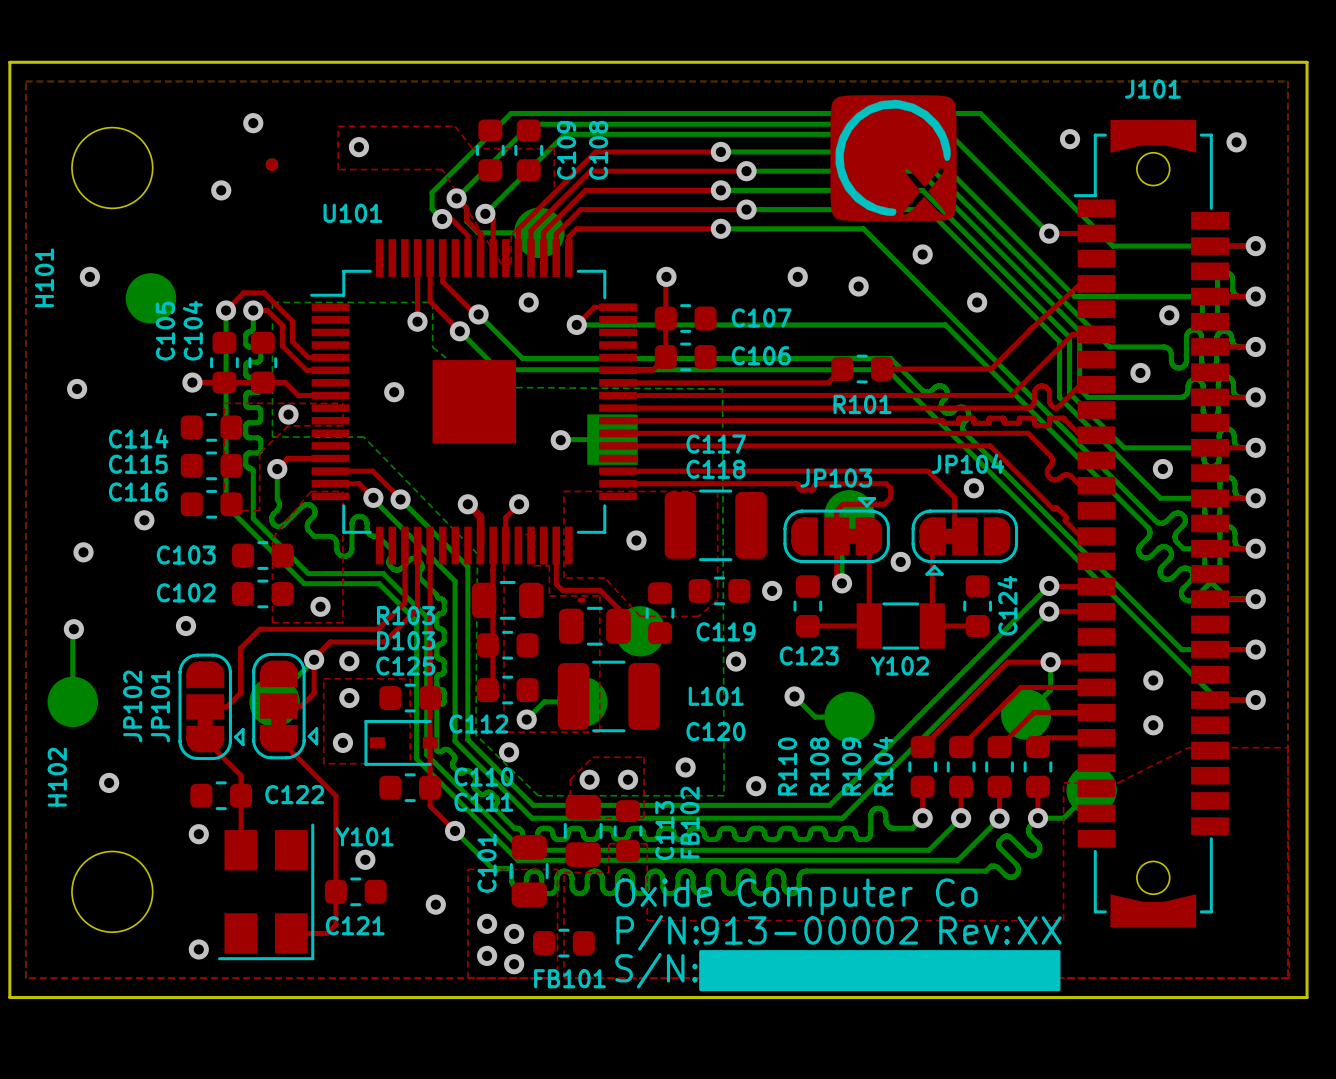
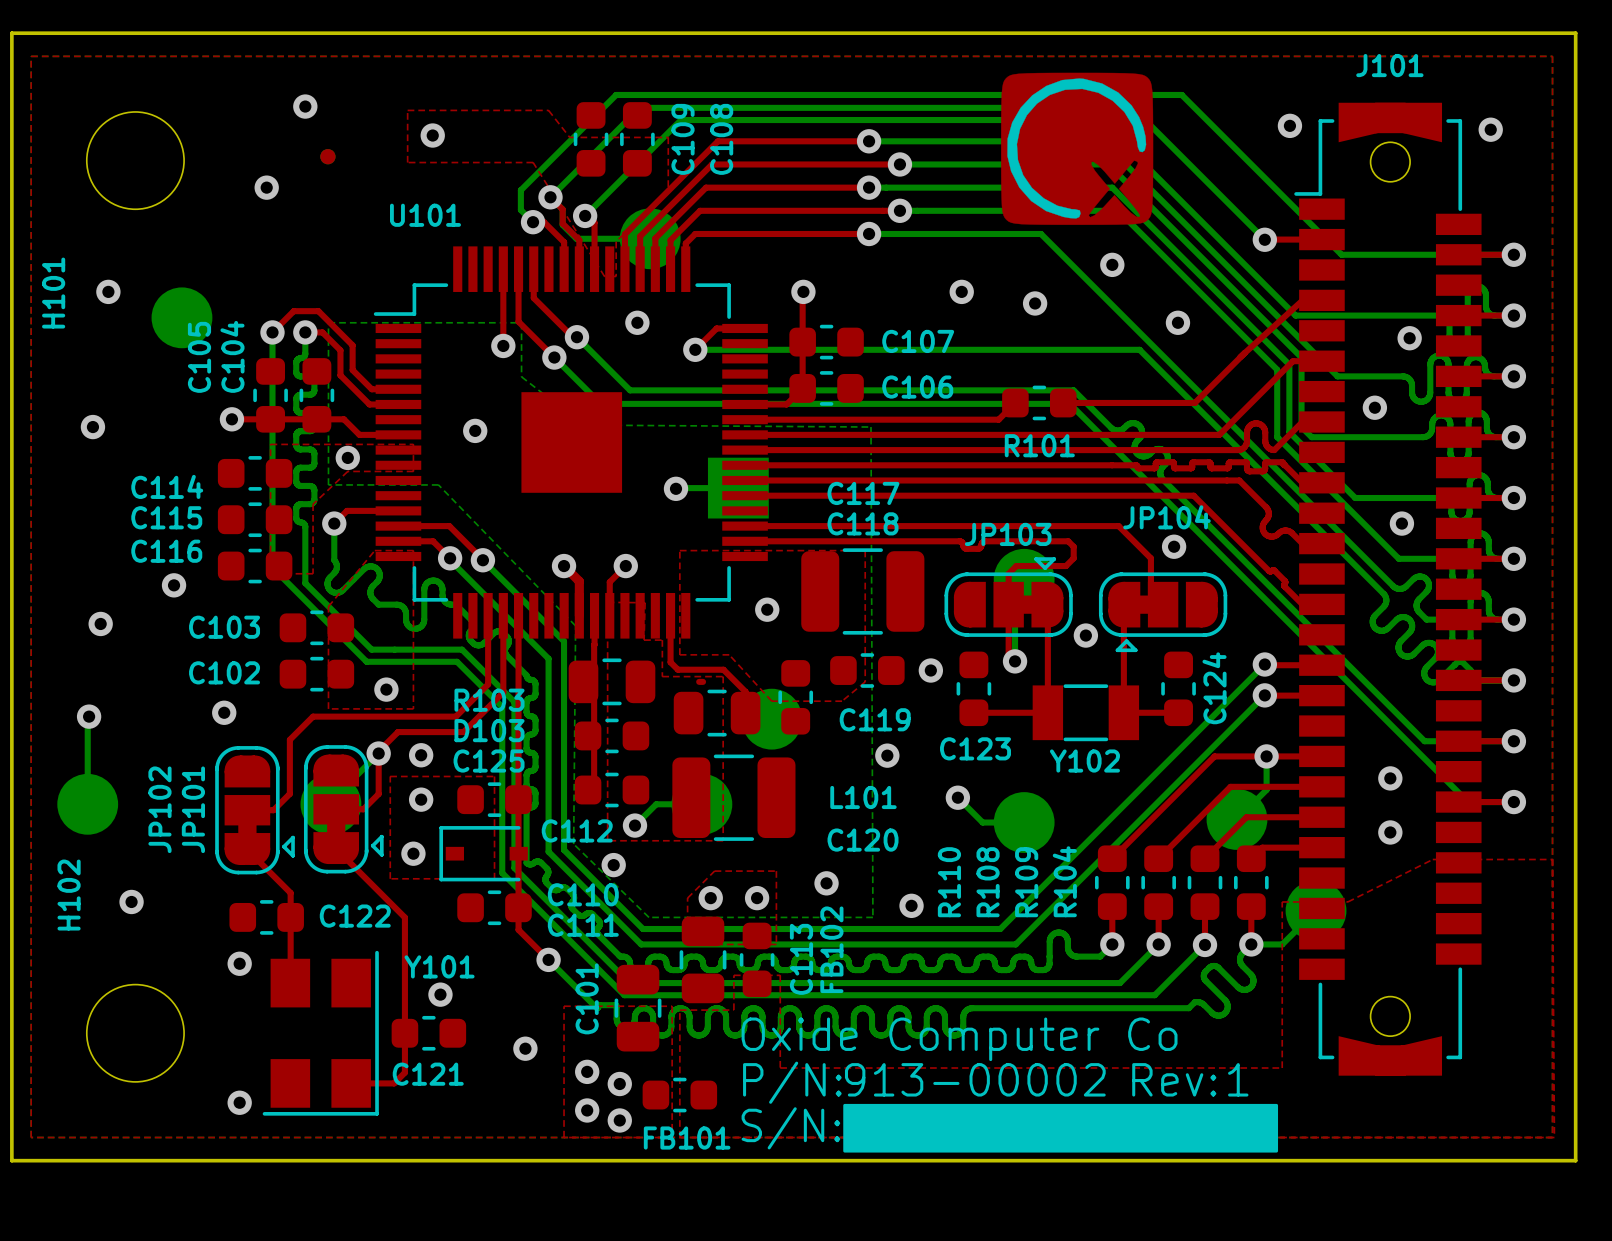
drawing shape: [615, 878, 1062, 992] -> [741, 1017, 1279, 1153]

